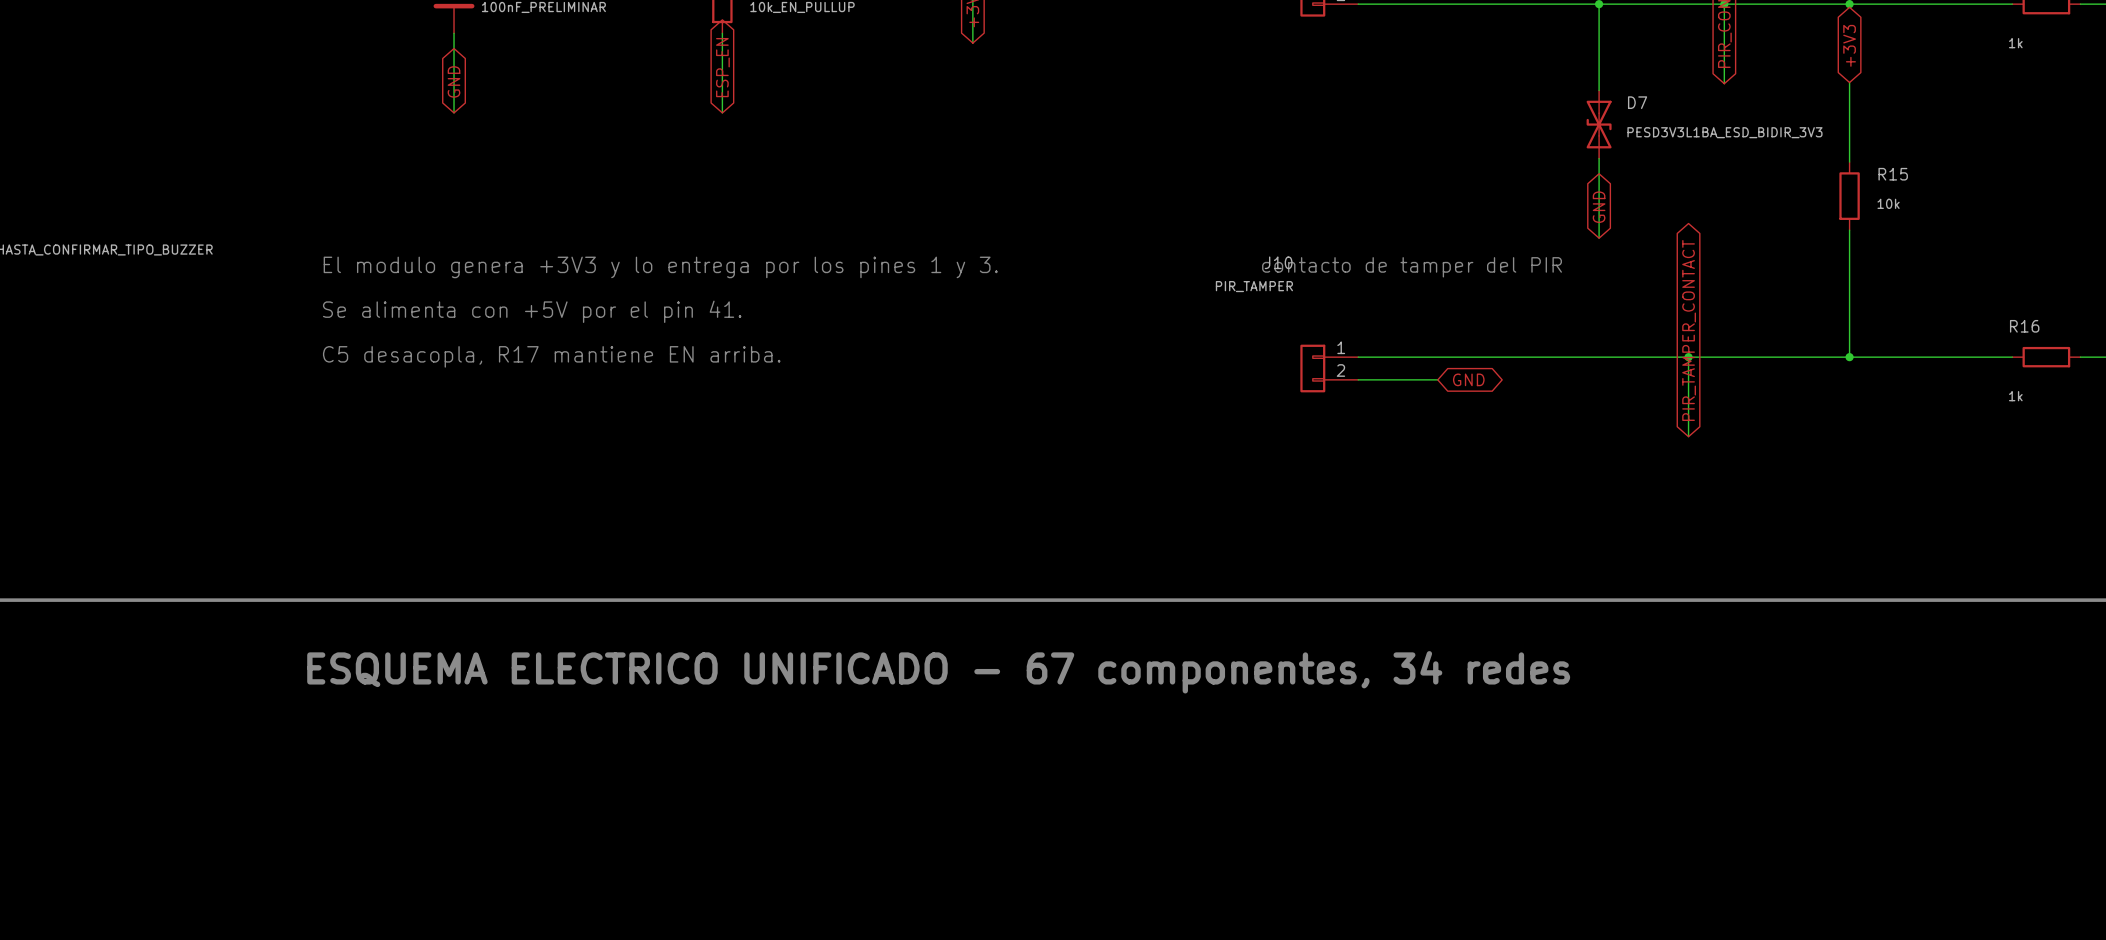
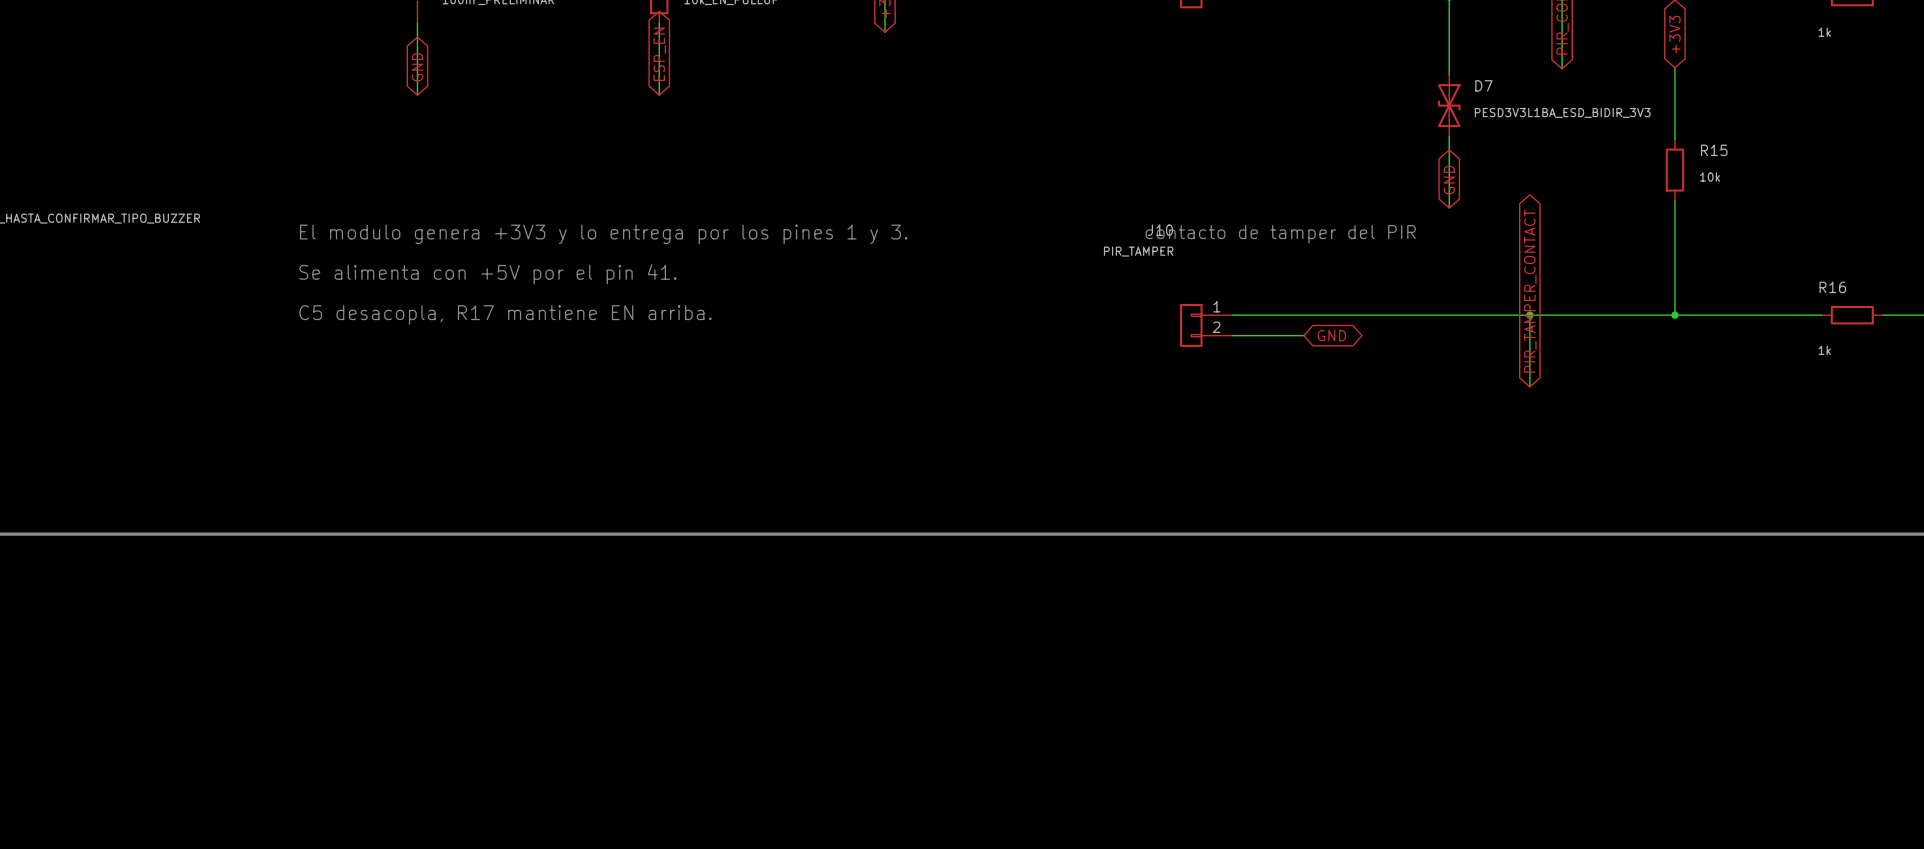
text: ESQUEMA ELECTRICO UNIFICADO - 67 componentes, 34 redes (938, 672) -> none

